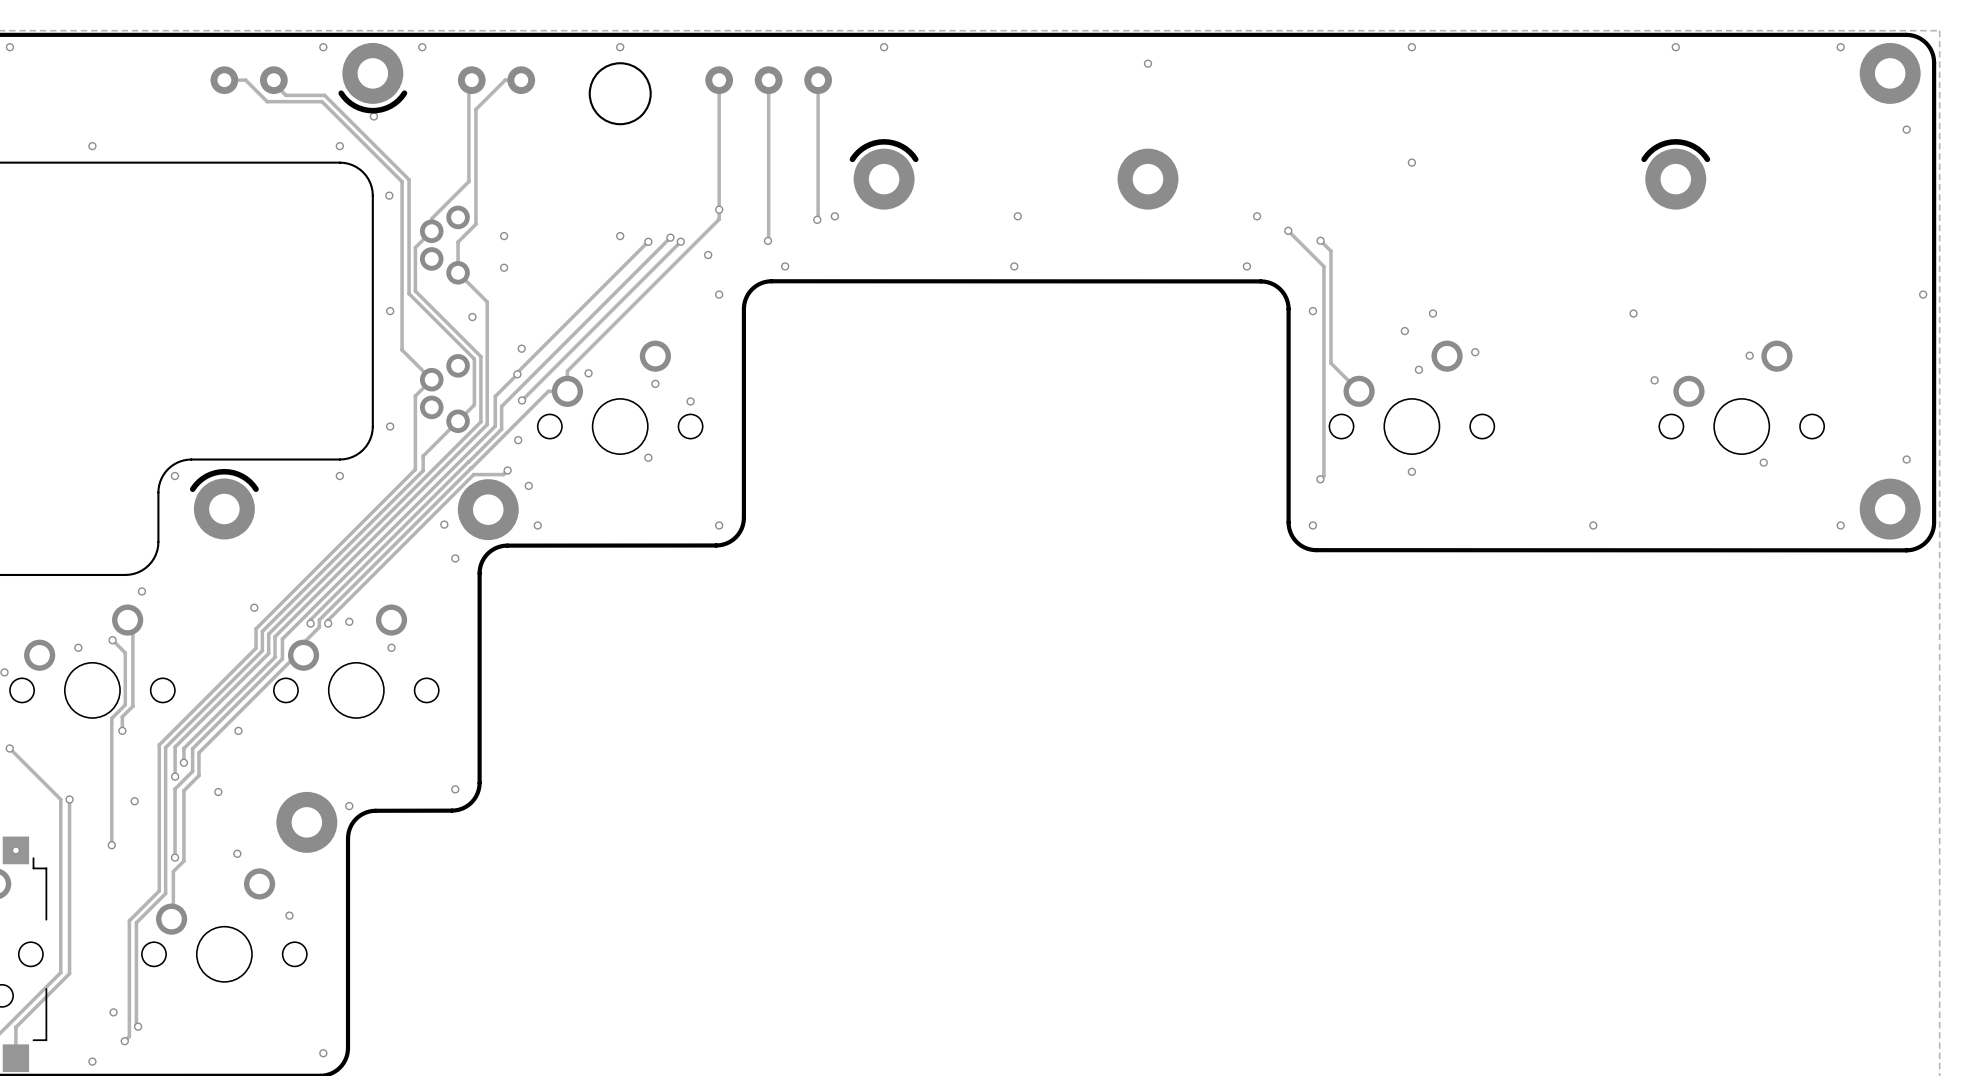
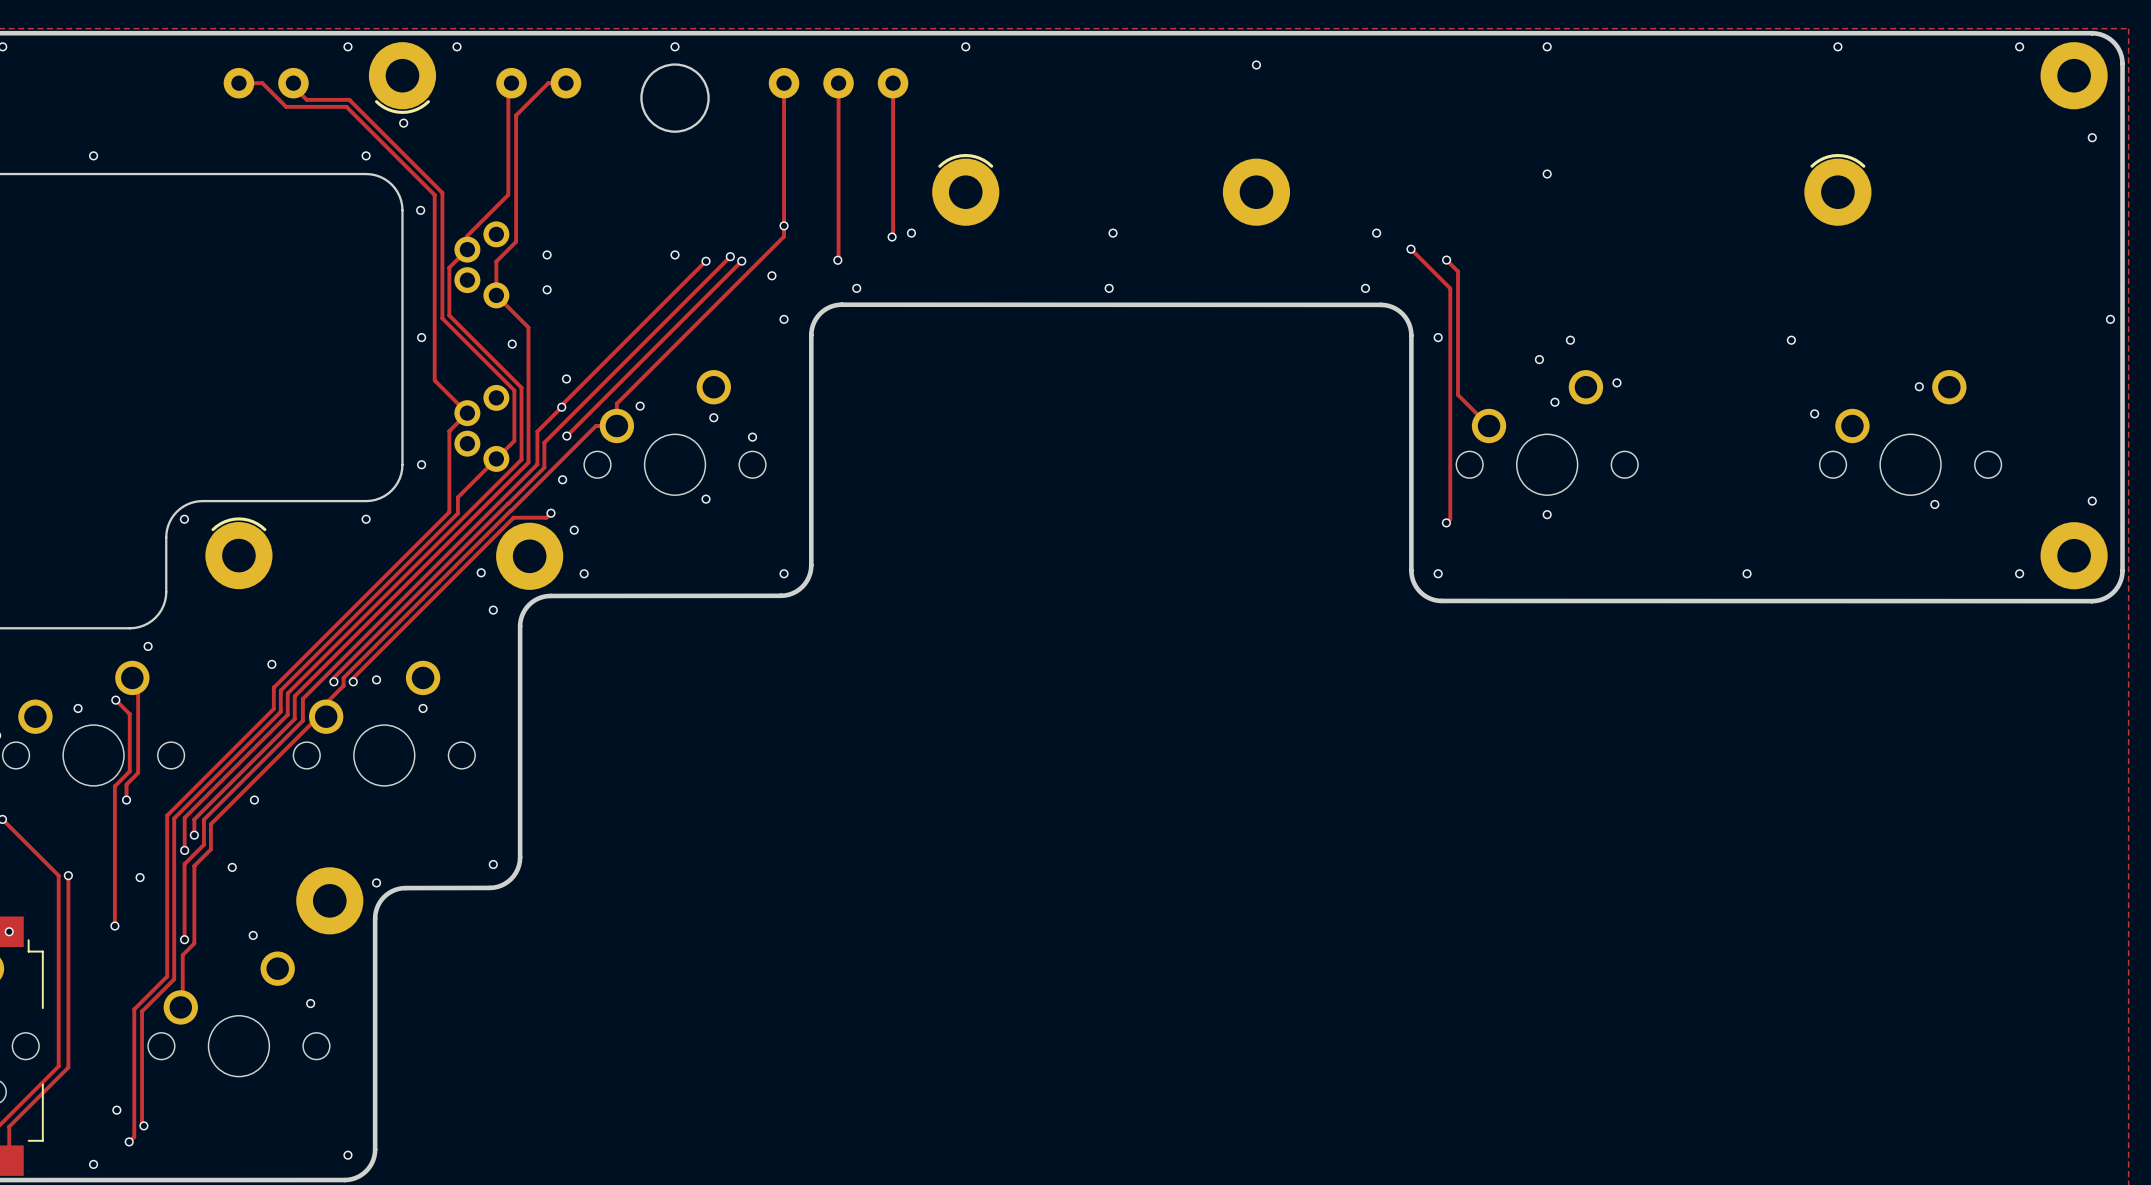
part footprint: [338, 42, 408, 114] -> [368, 42, 437, 114]
part footprint: [849, 139, 919, 210] -> [932, 153, 1000, 226]
part footprint: [1641, 139, 1711, 210] -> [1804, 153, 1872, 226]
part footprint: [189, 468, 259, 540] -> [205, 517, 273, 590]

